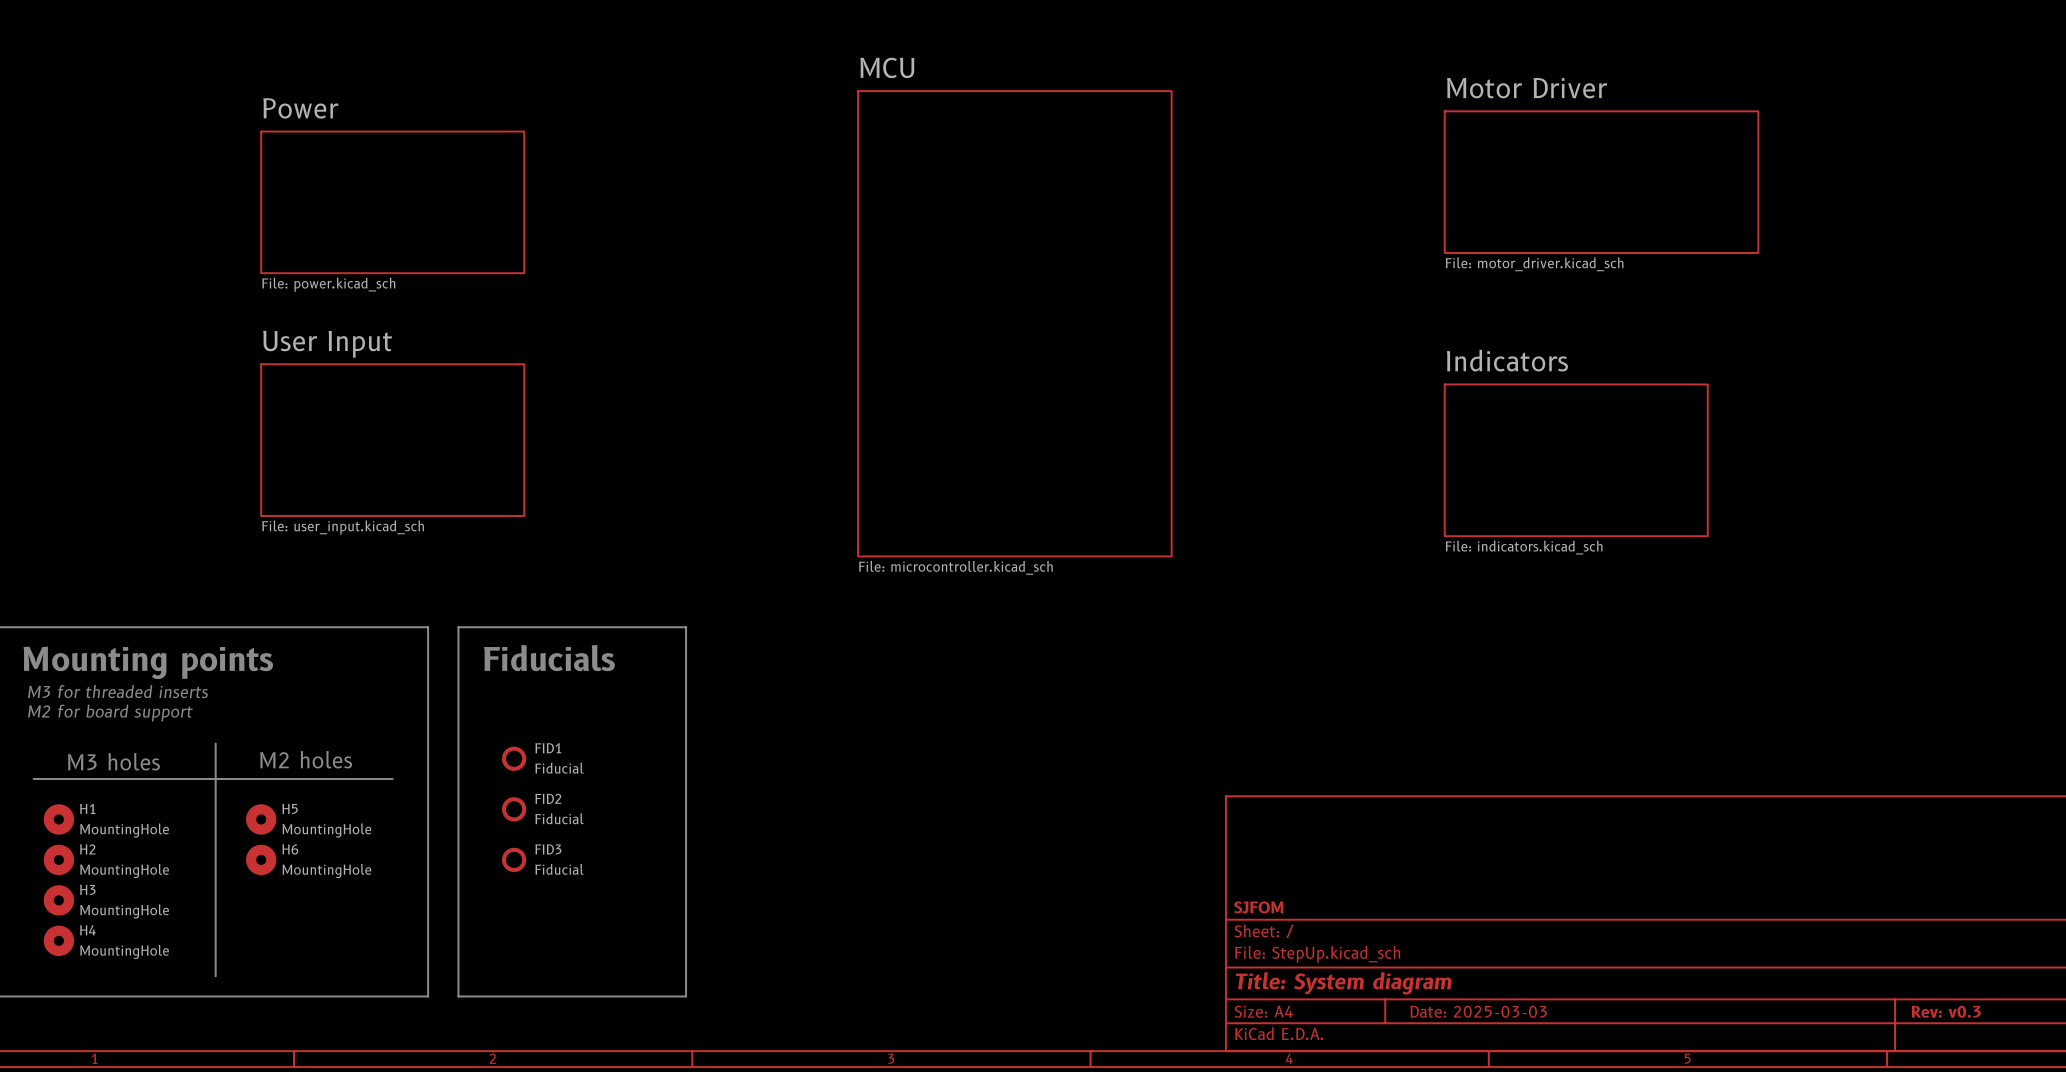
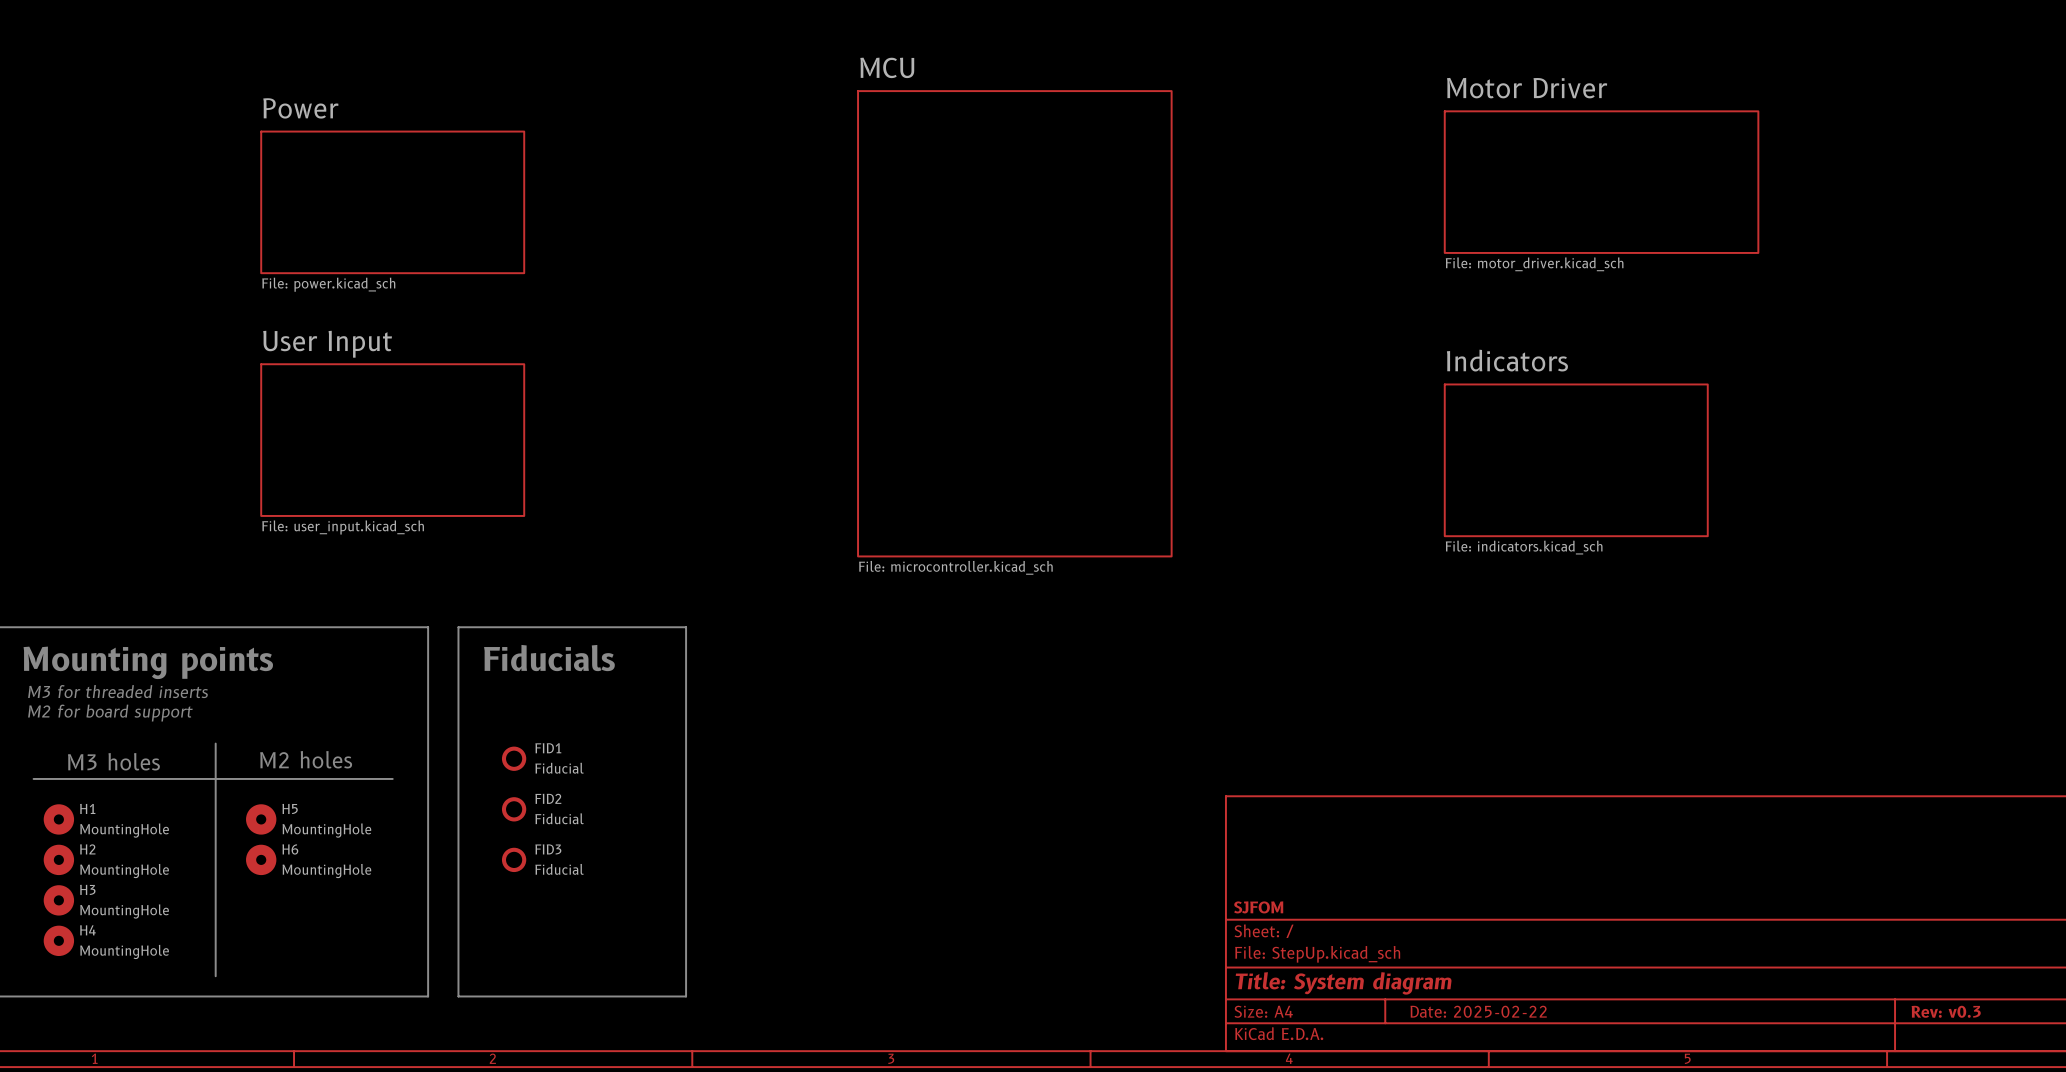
title block: Date: 2025-03-03 (1478, 1011) -> Date: 2025-02-22 (1478, 1011)

